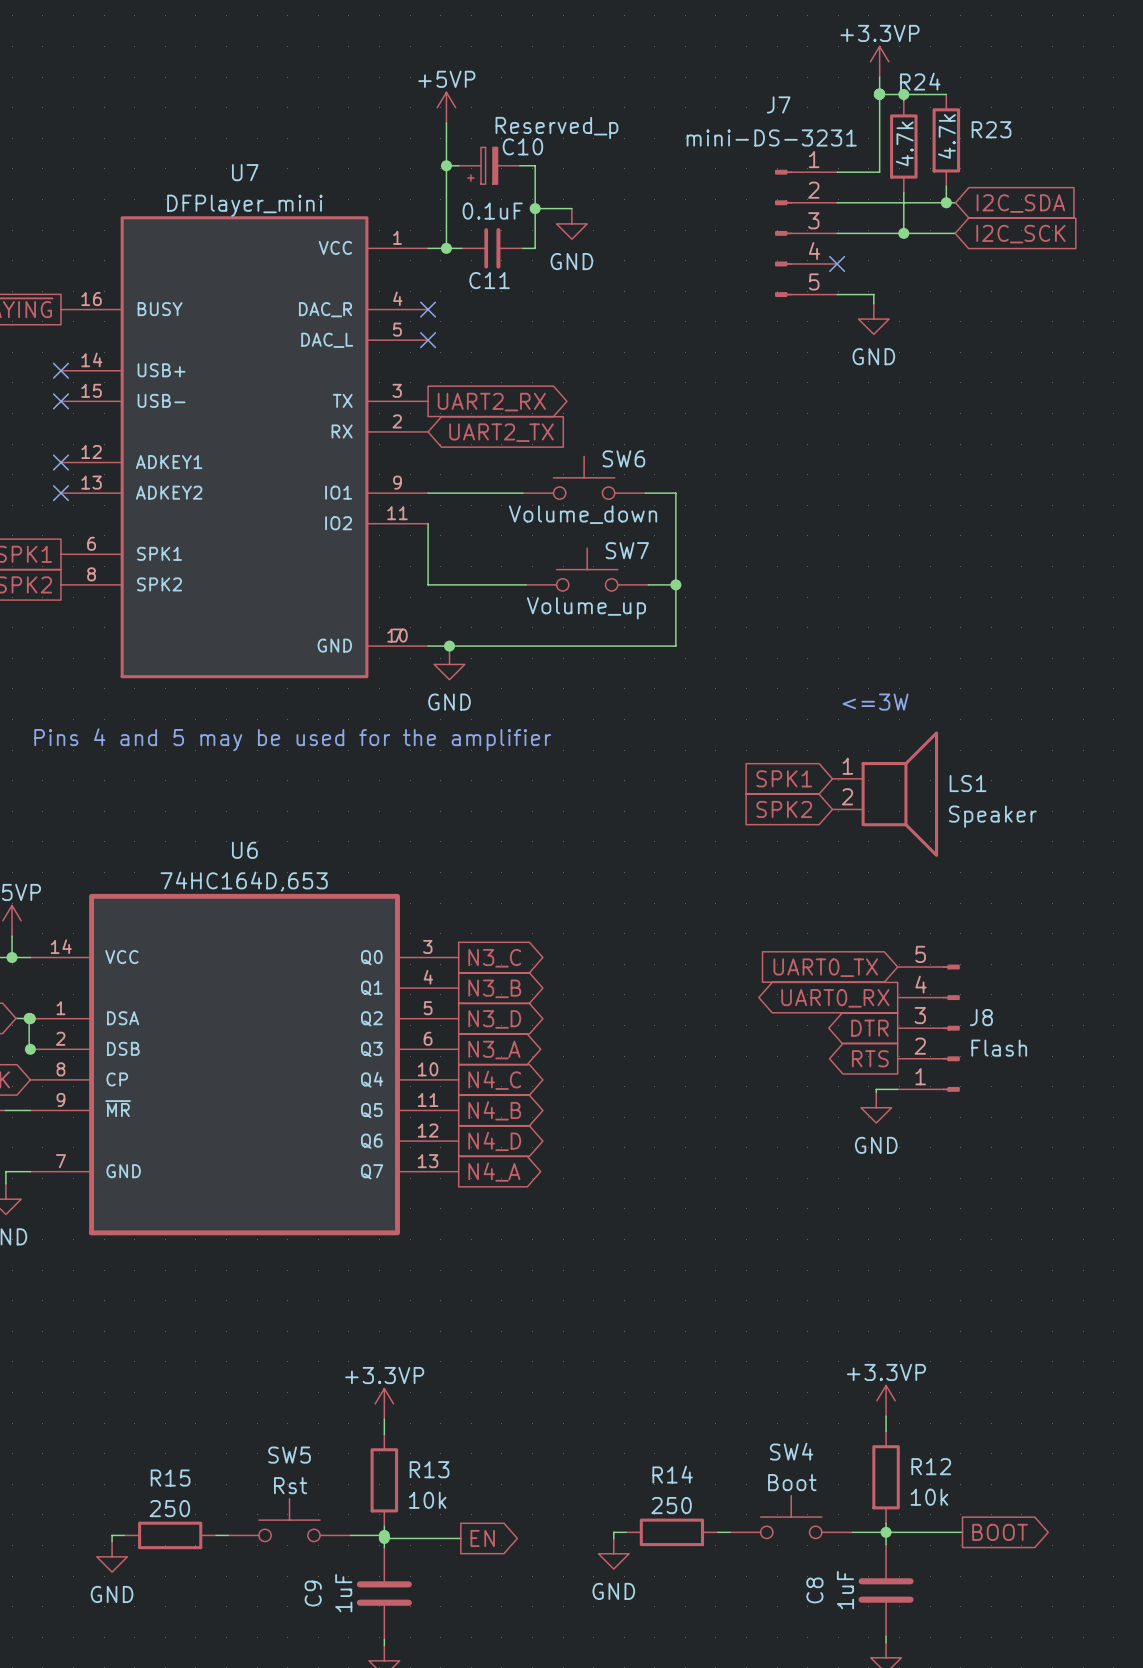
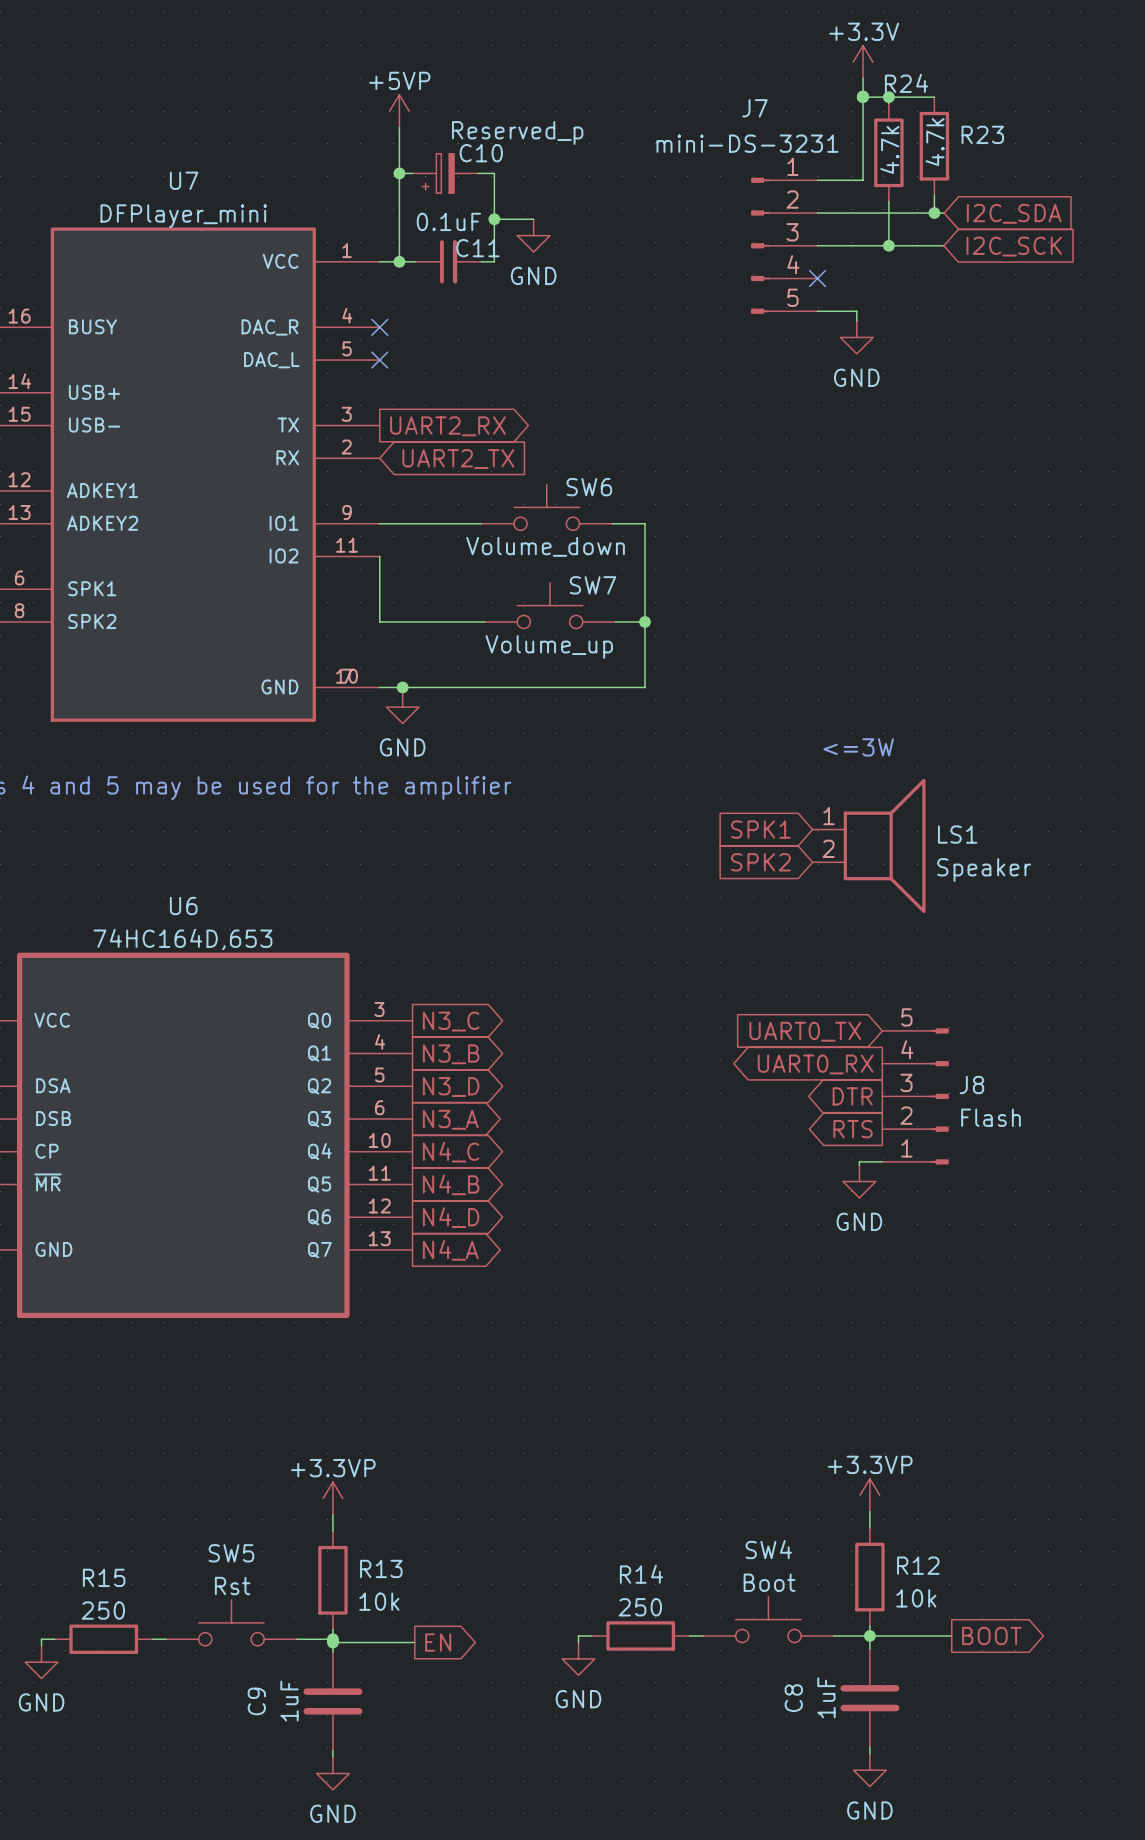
power symbol: +3.3VP (879, 61) -> +3.3V (863, 62)
C11 name position: C11 (489, 280) -> C11 (477, 248)

